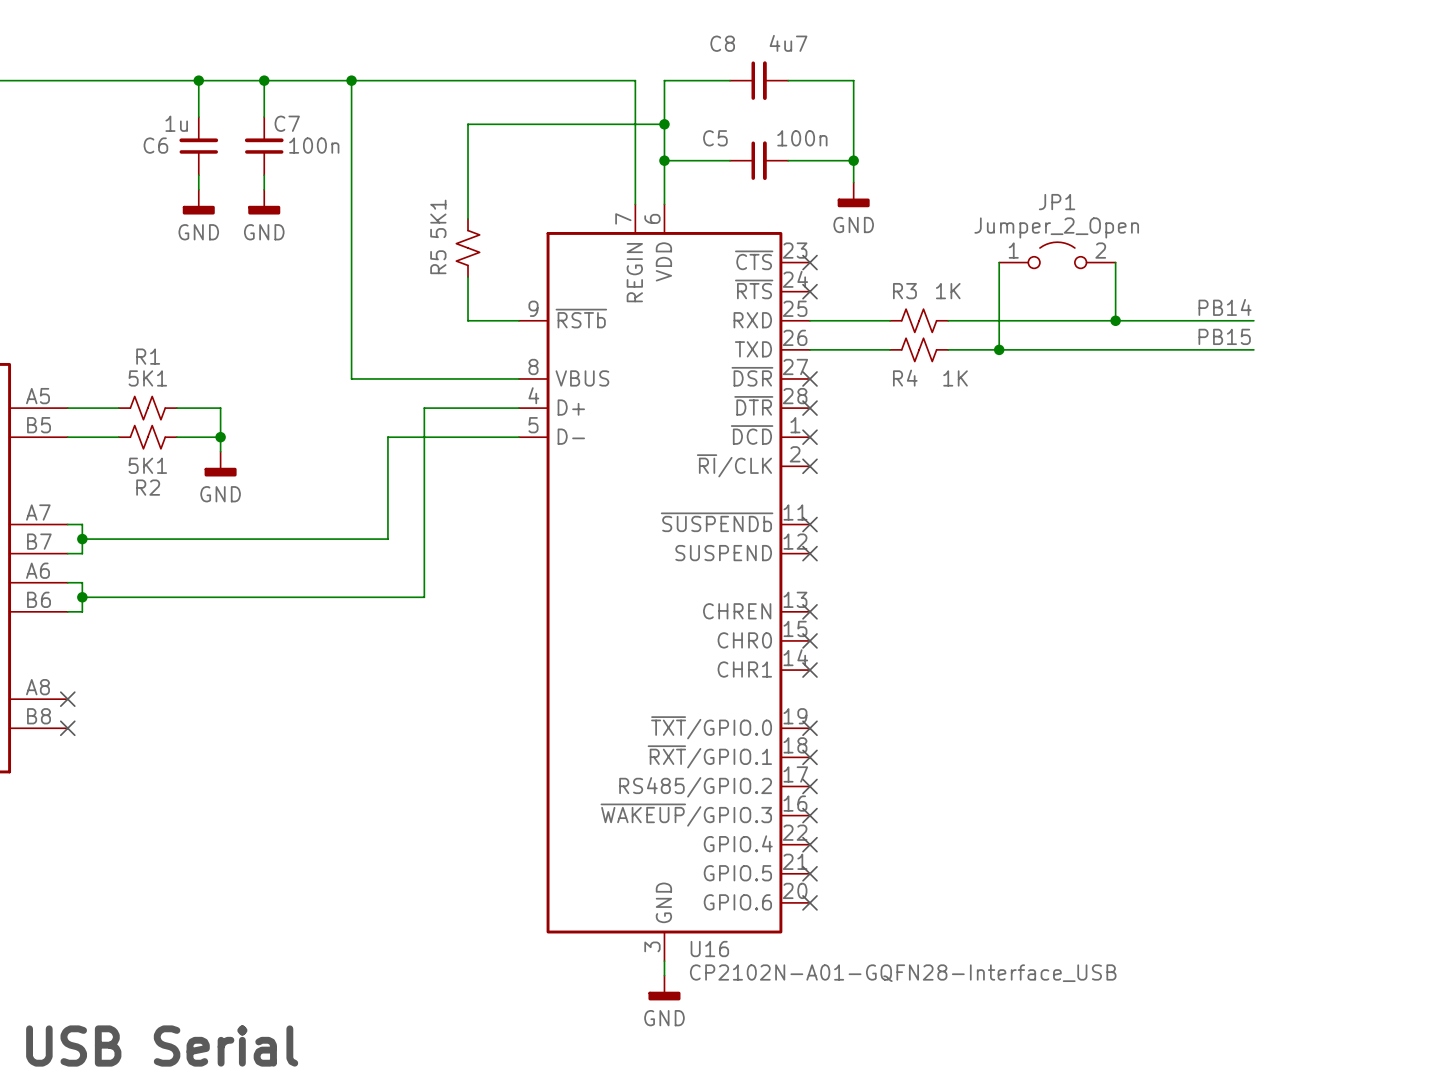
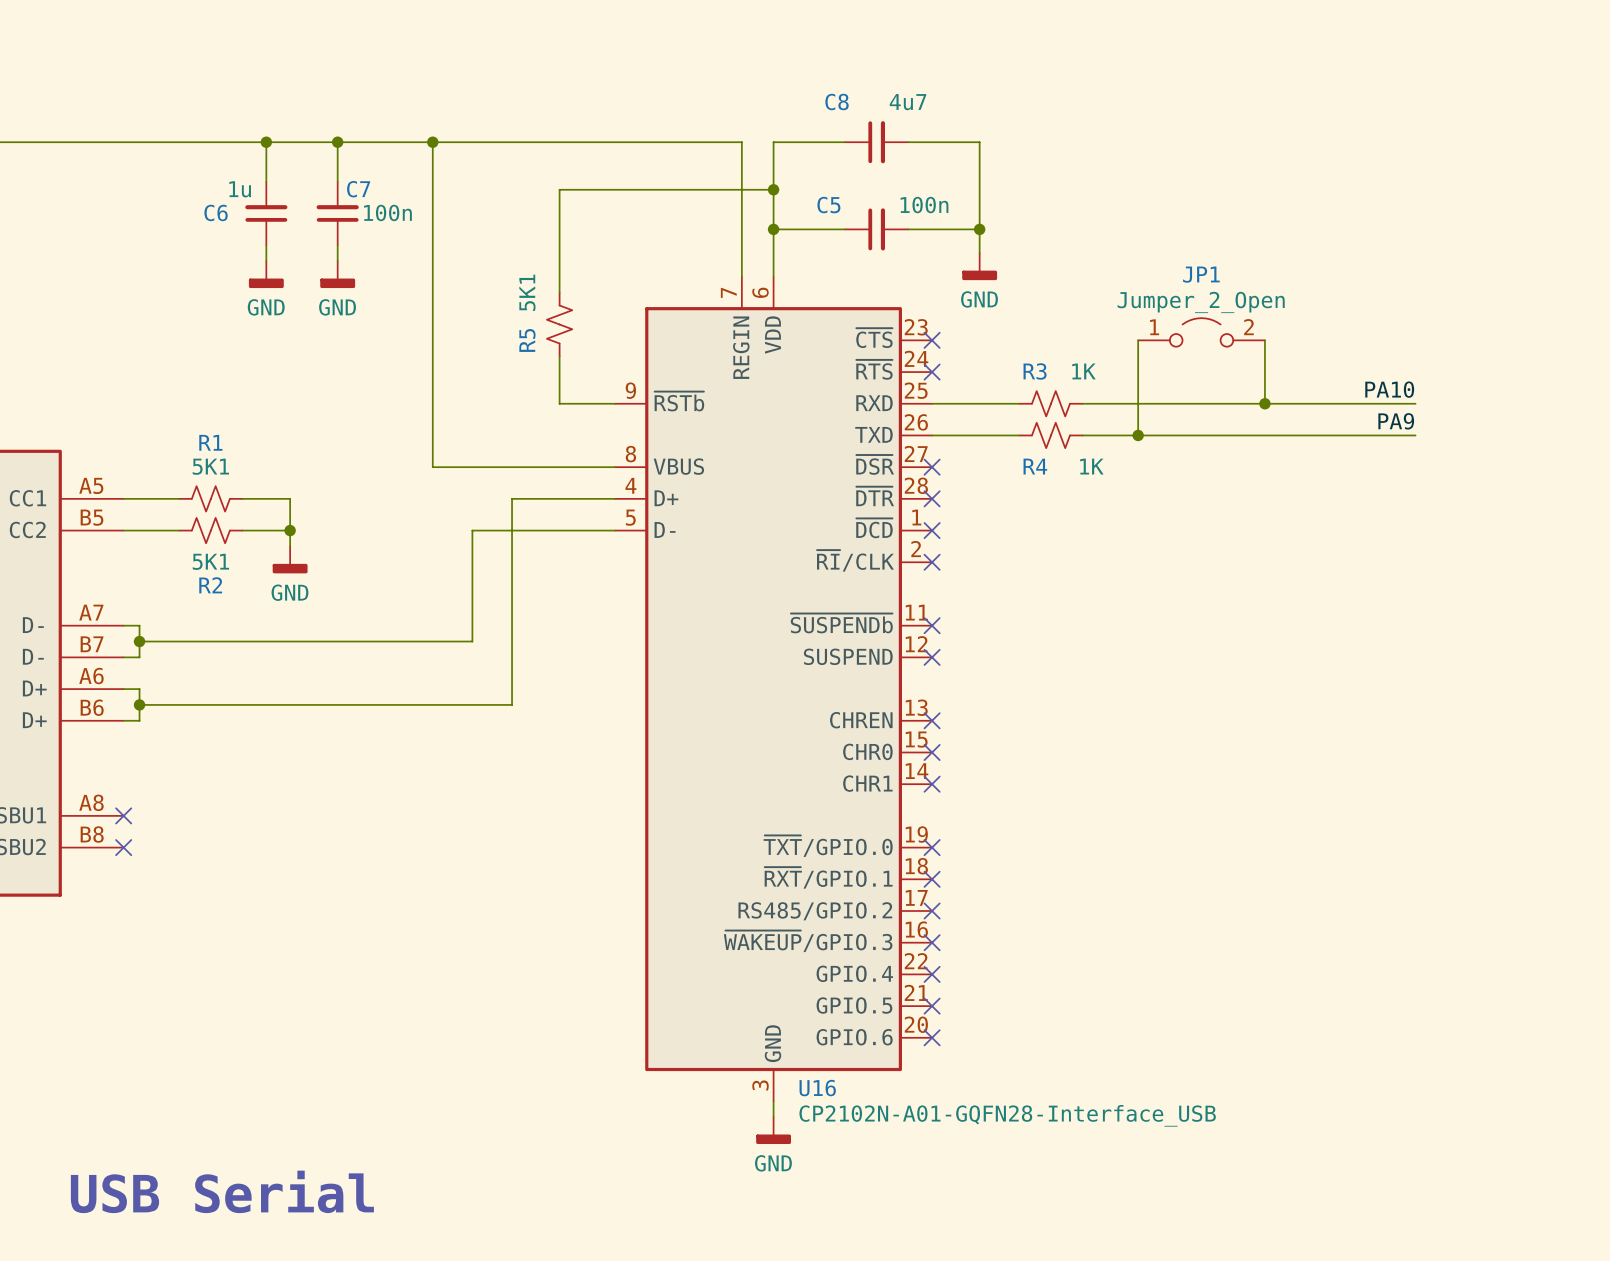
label: PB14 (1225, 307) -> PA10 (1389, 389)
label: PB15 (1224, 336) -> PA9 (1396, 421)

